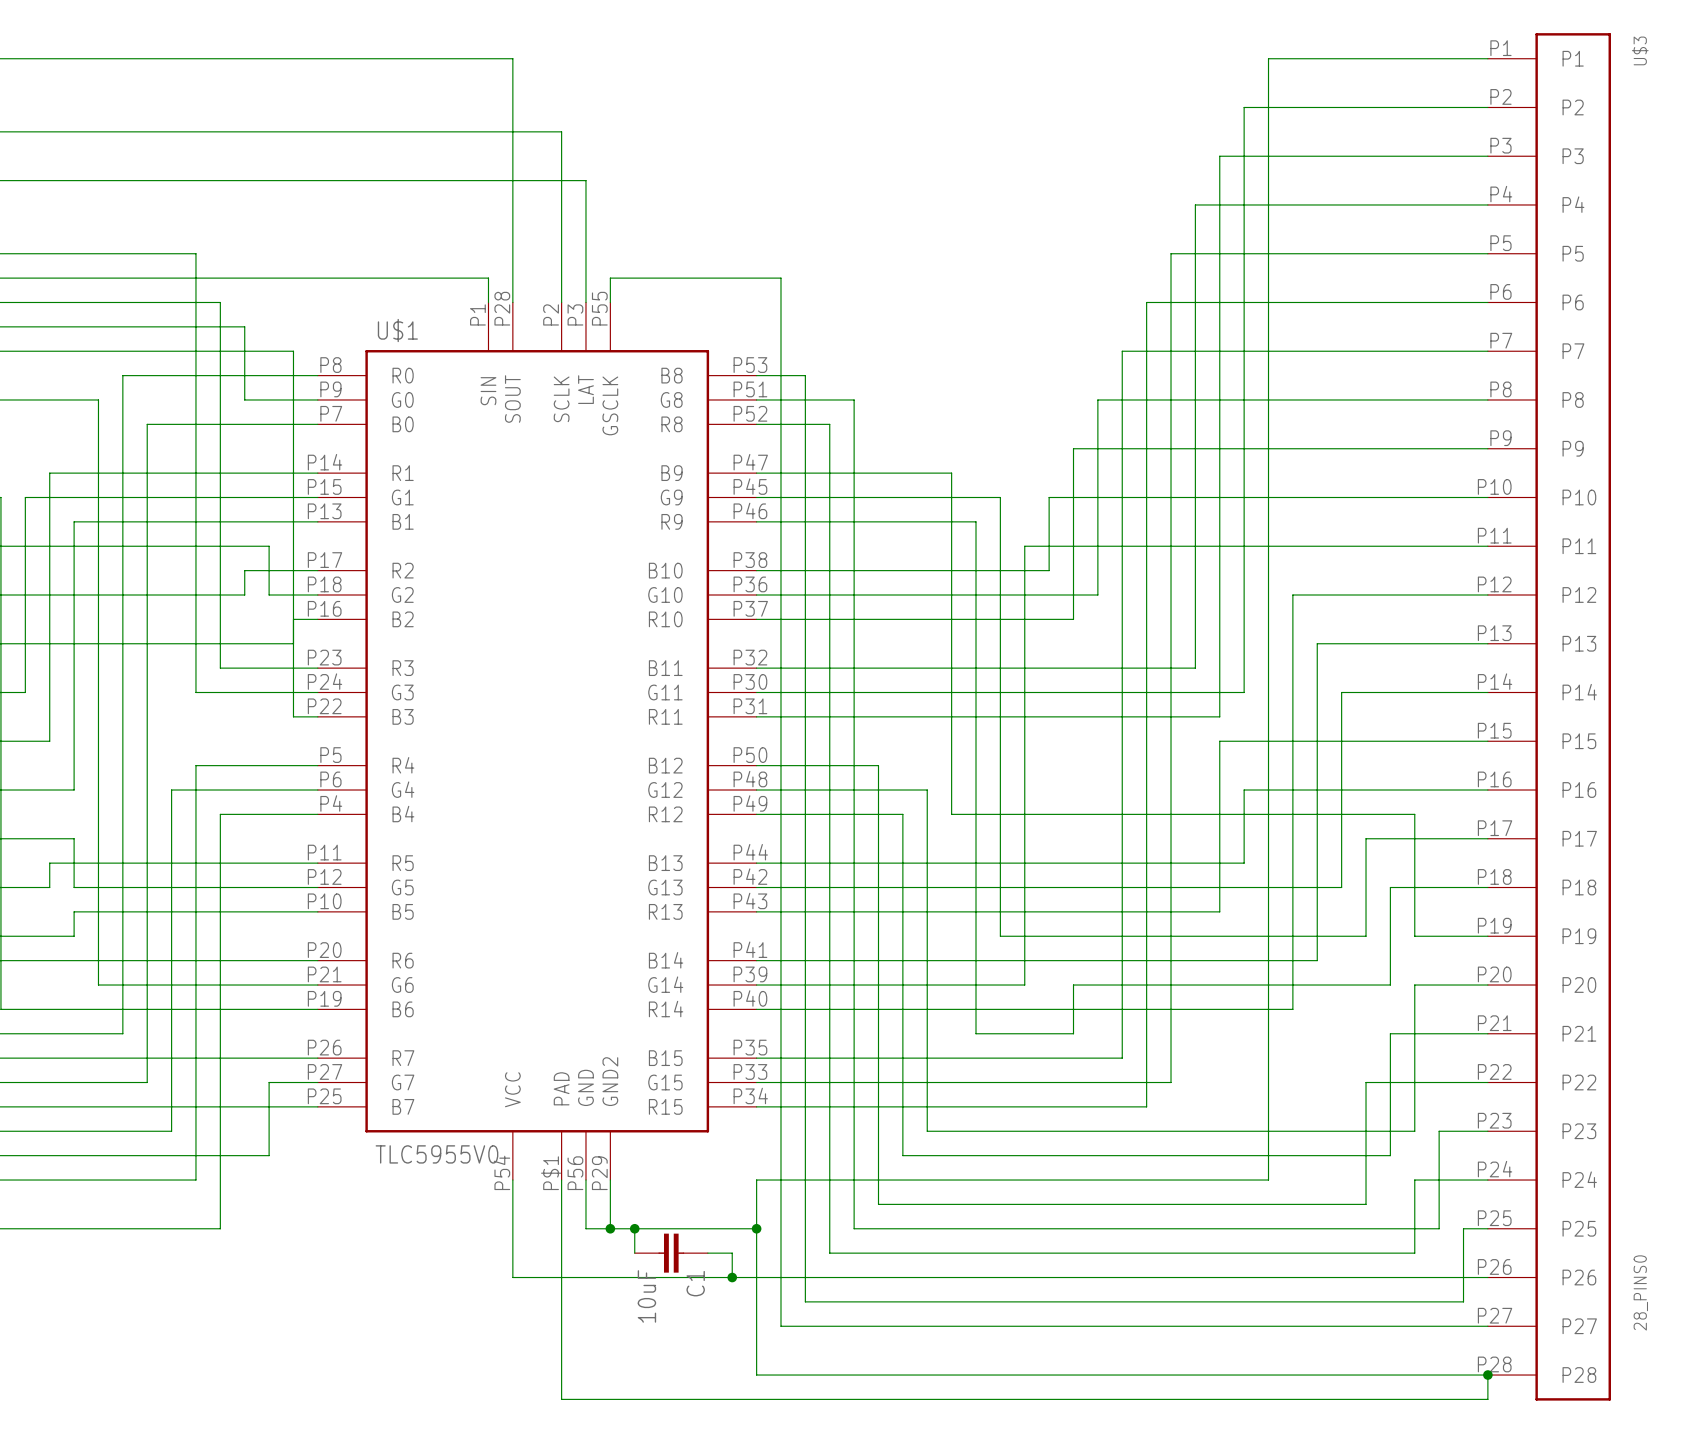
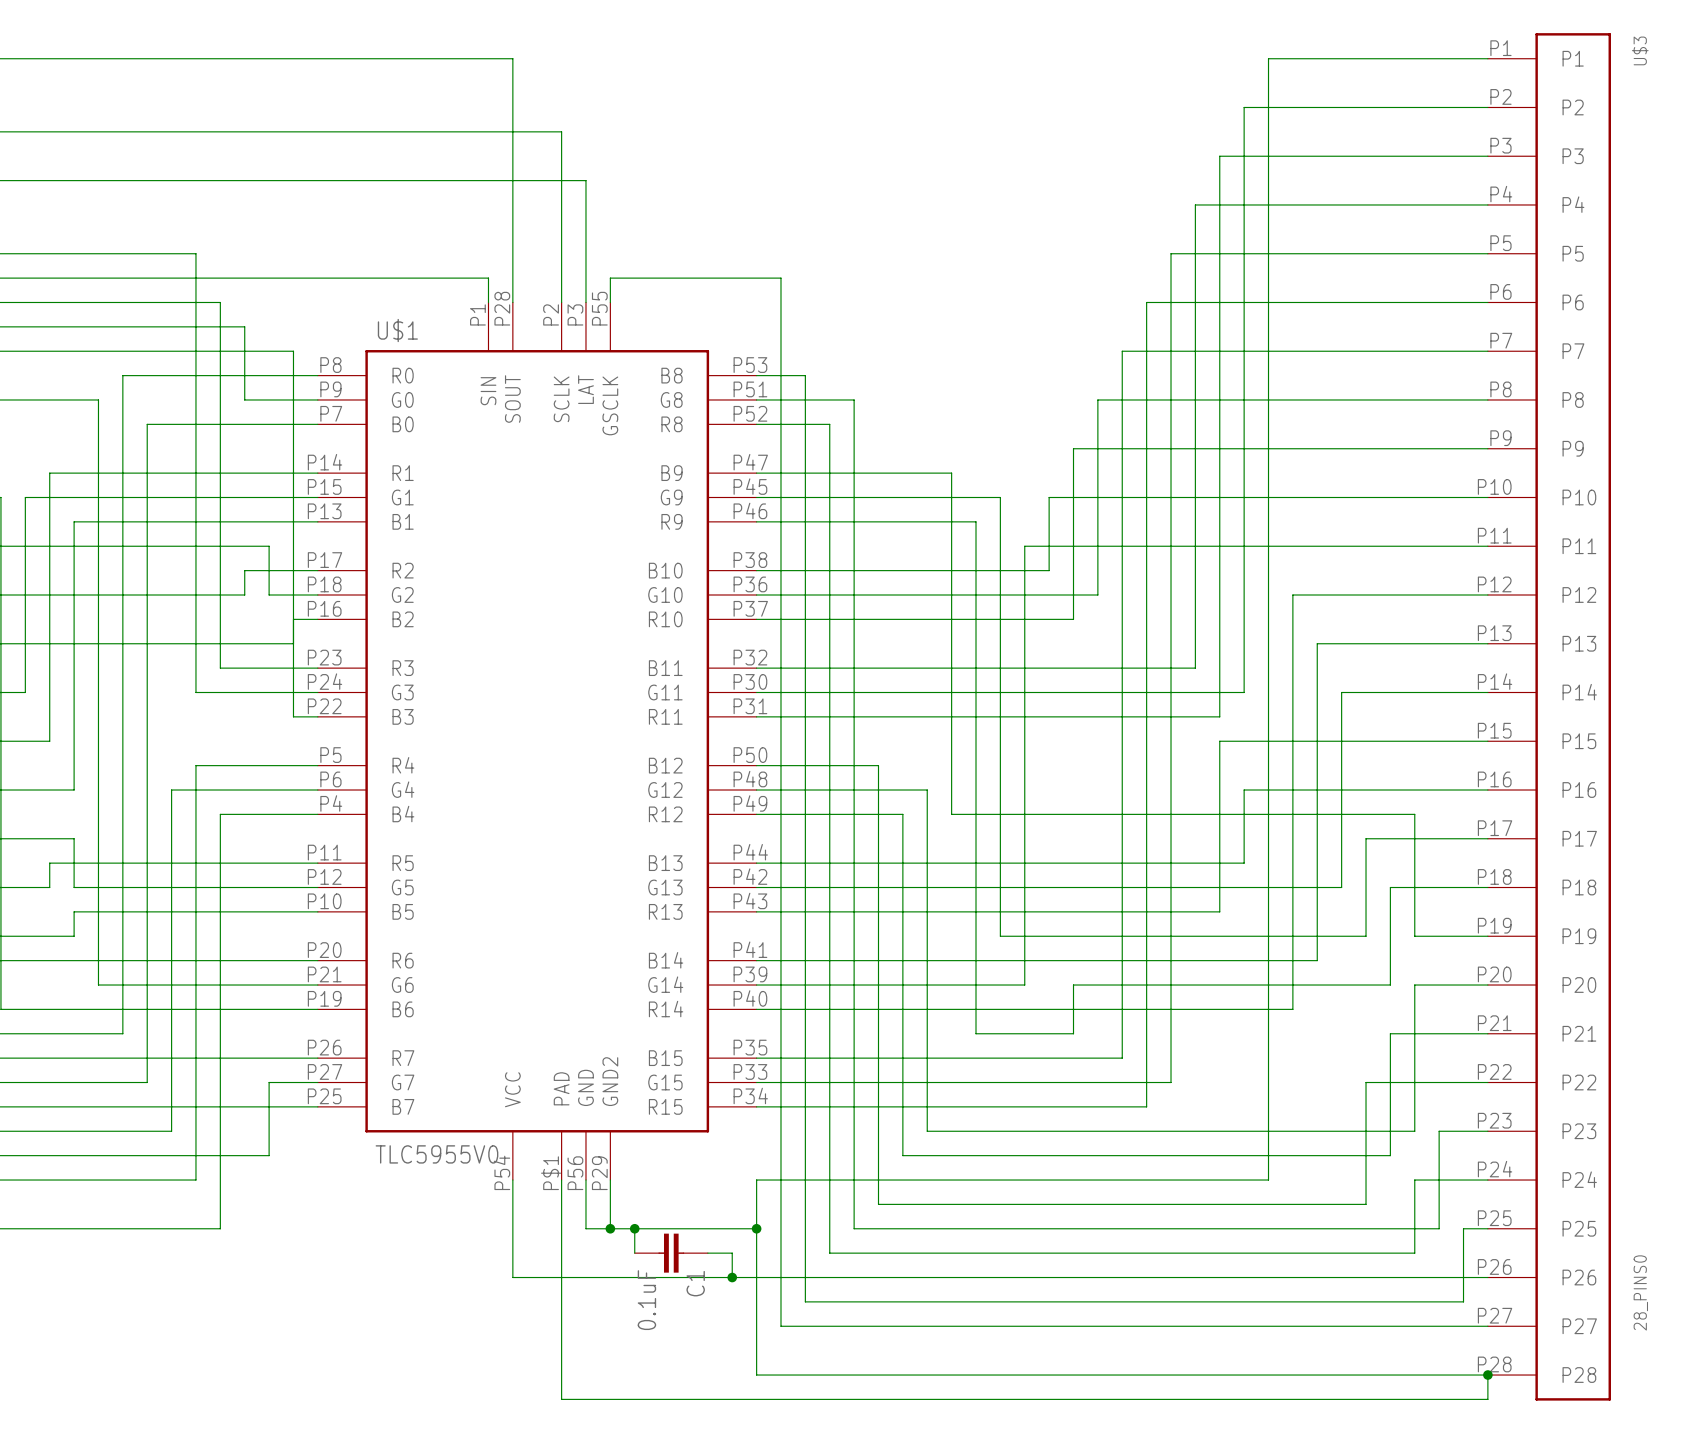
C1 value: 10uF (646, 1296) -> 0.1uF (646, 1300)

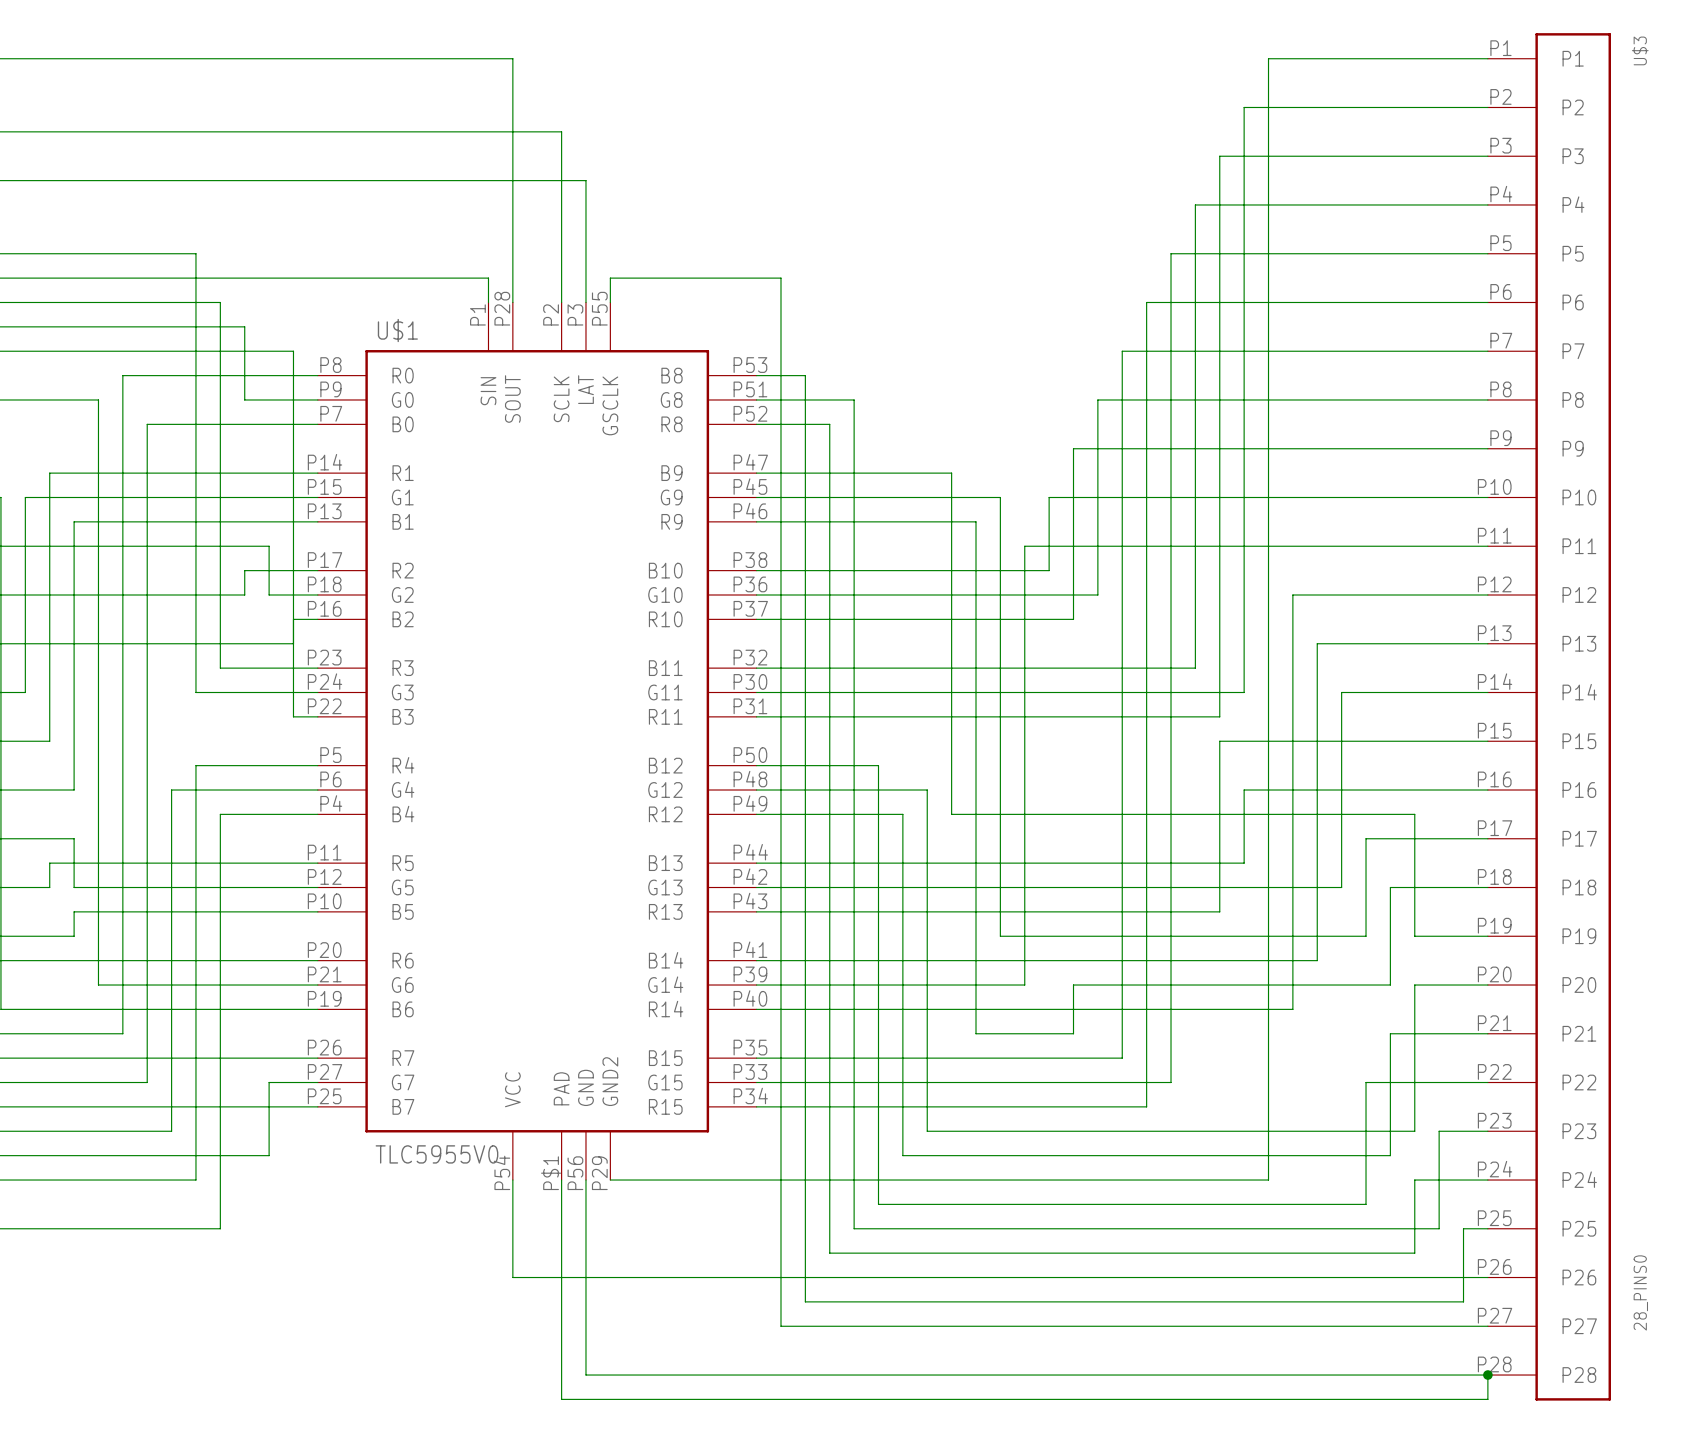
wire: (610, 1180) (610, 1228) -> (610, 1180) (756, 1180)
wire: (756, 1180) (756, 1375) -> none
wire: (585, 1228) (756, 1228) -> (585, 1228) (585, 1375) (756, 1375)
junction: (610, 1228) -> none
wire: (634, 1228) (634, 1253) -> none
junction: (634, 1228) -> none
junction: (756, 1228) -> none
C1: 0.1uF (671, 1253) -> none
wire: (707, 1253) (732, 1253) (732, 1277) -> none
junction: (732, 1277) -> none

